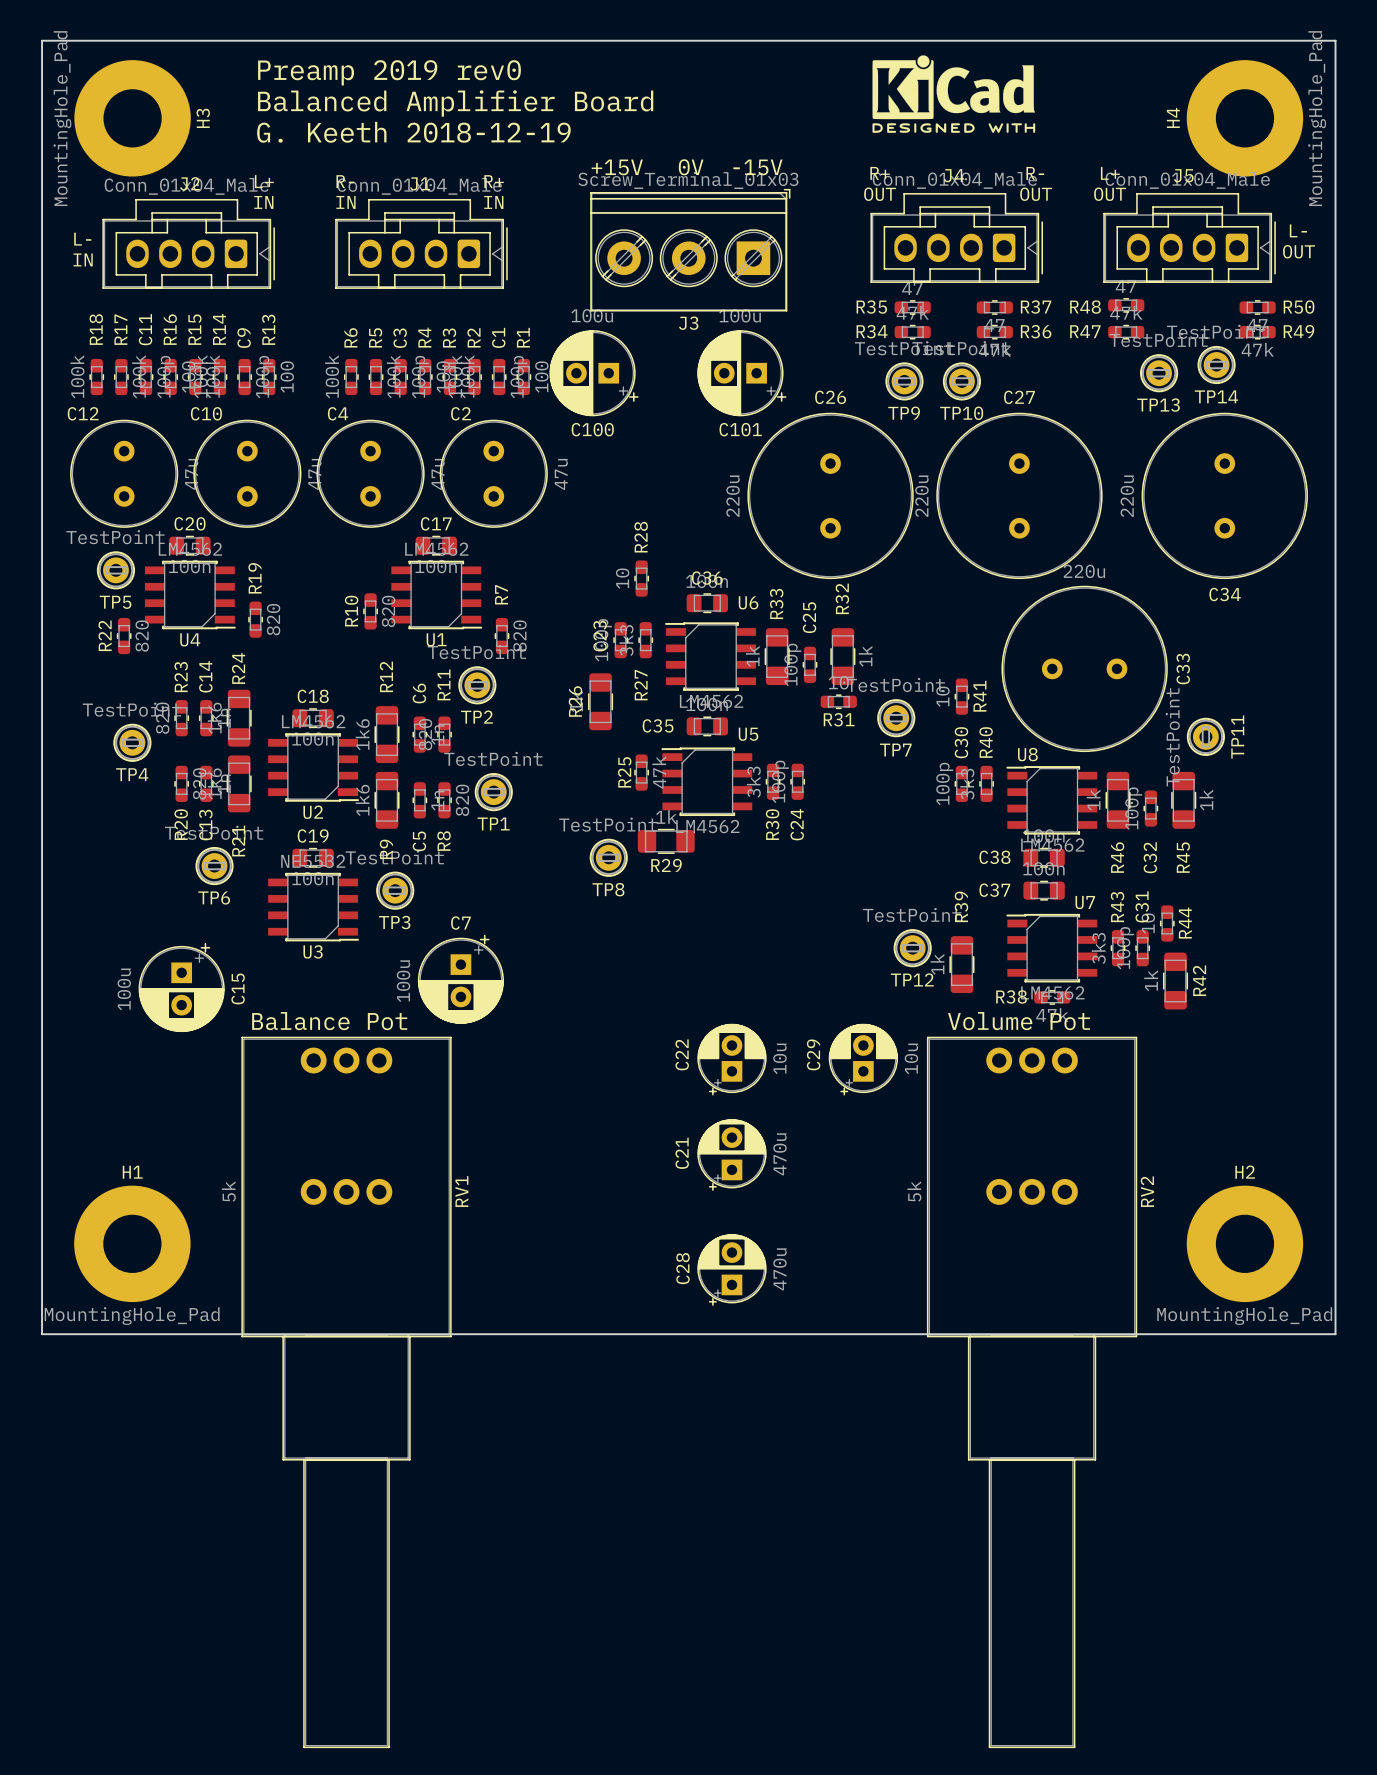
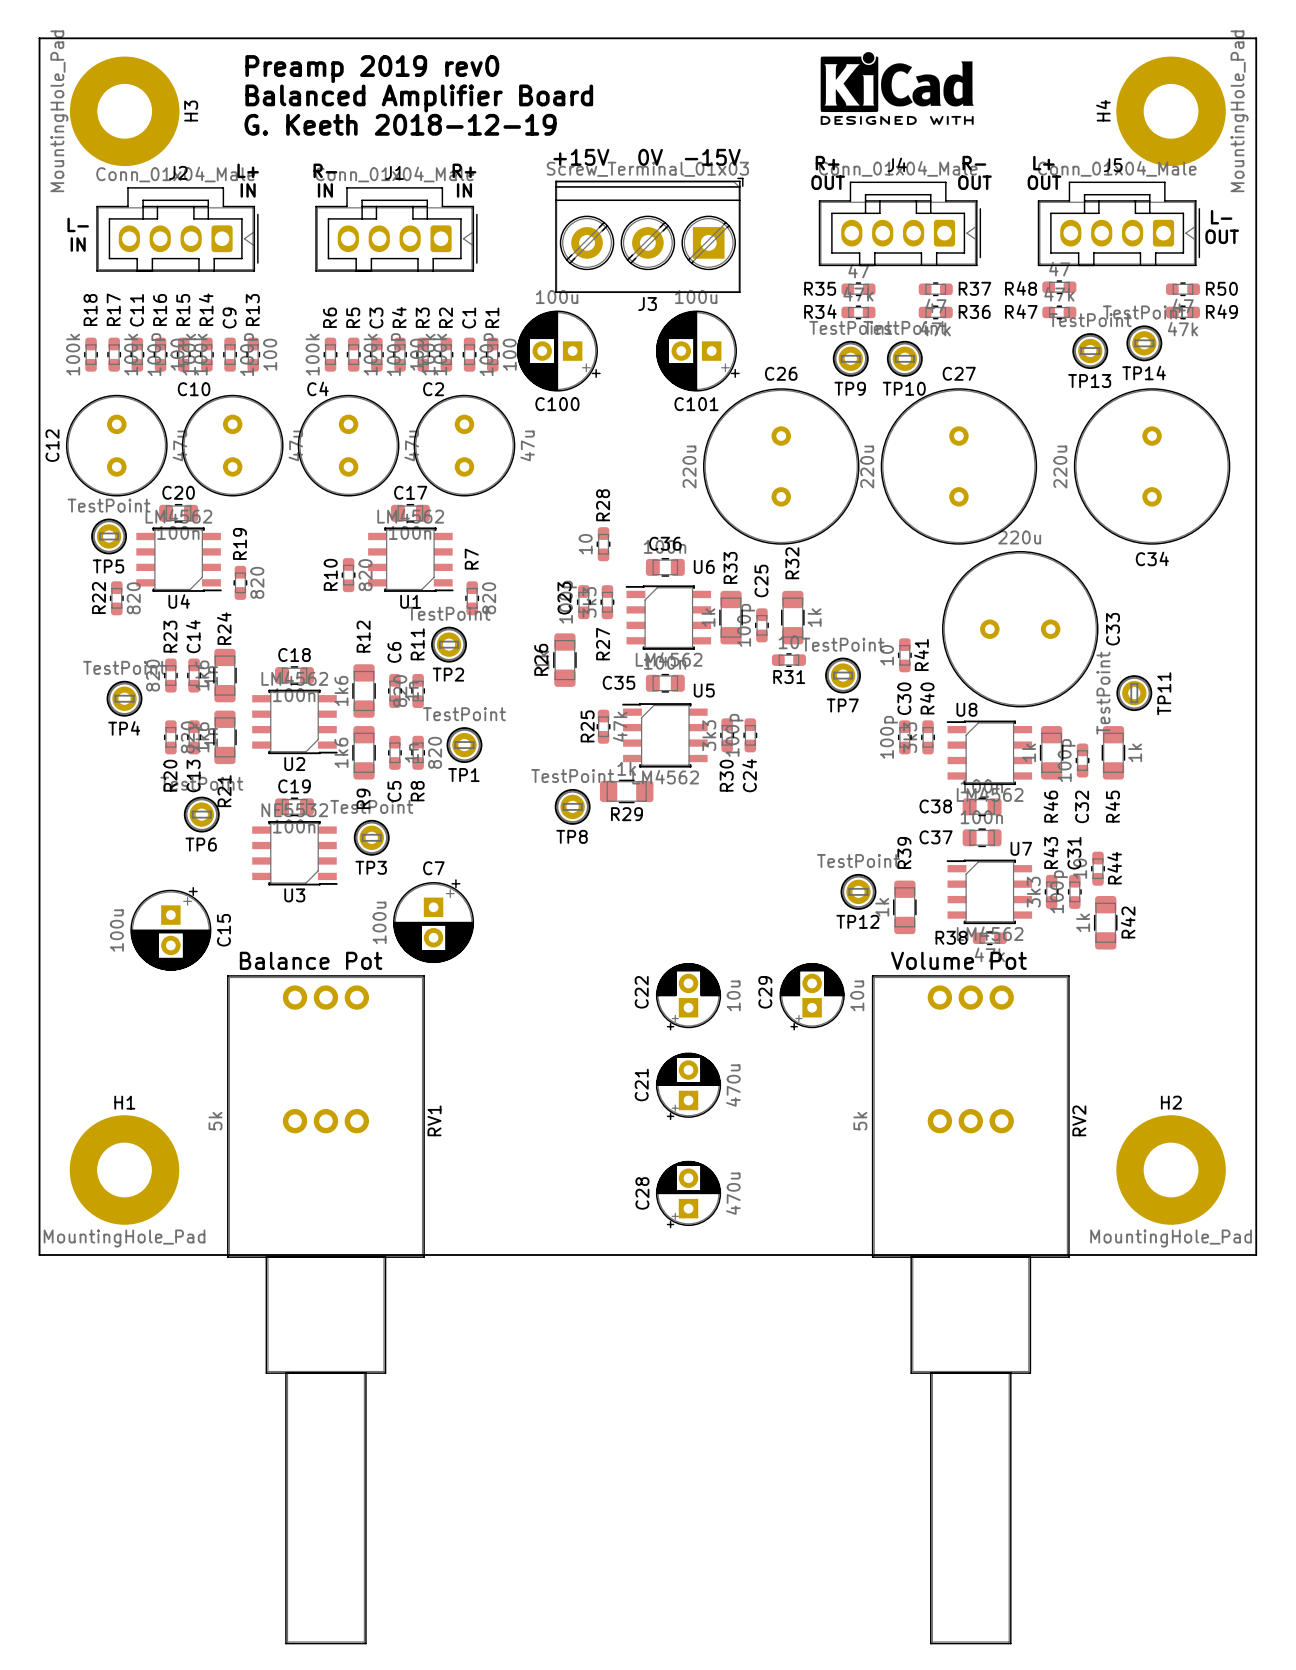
C12 name rotation: 0° (83, 413) -> 90° counterclockwise (52, 445)
C12 name position: C12 (83, 413) -> C12 (52, 445)

